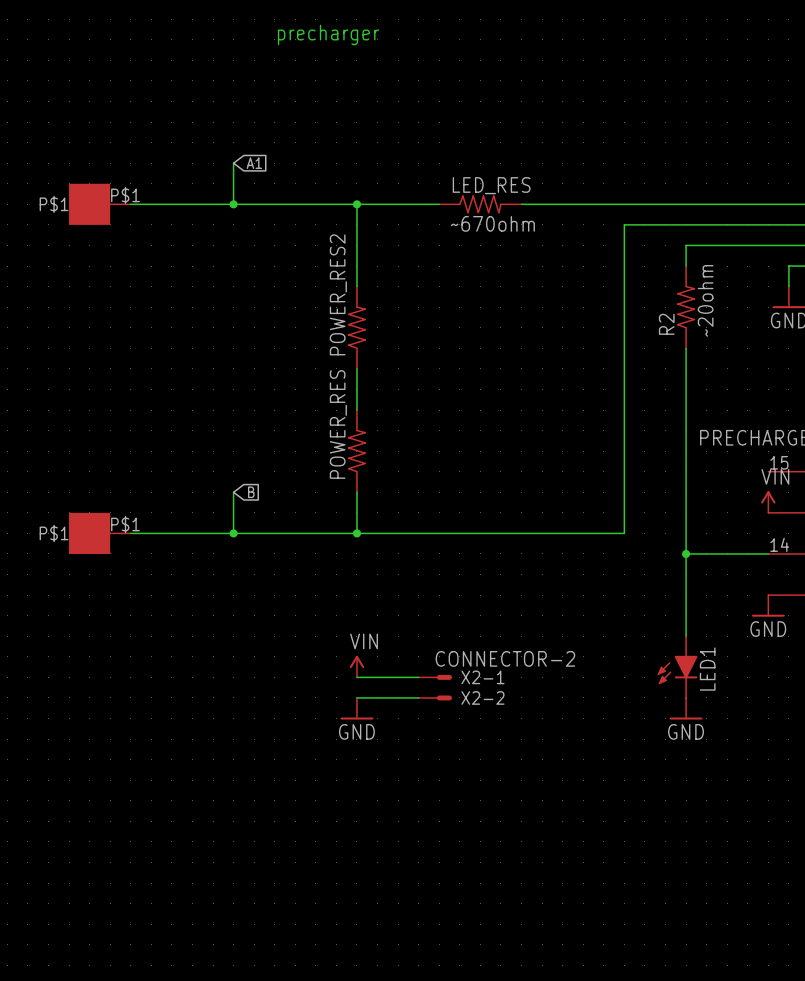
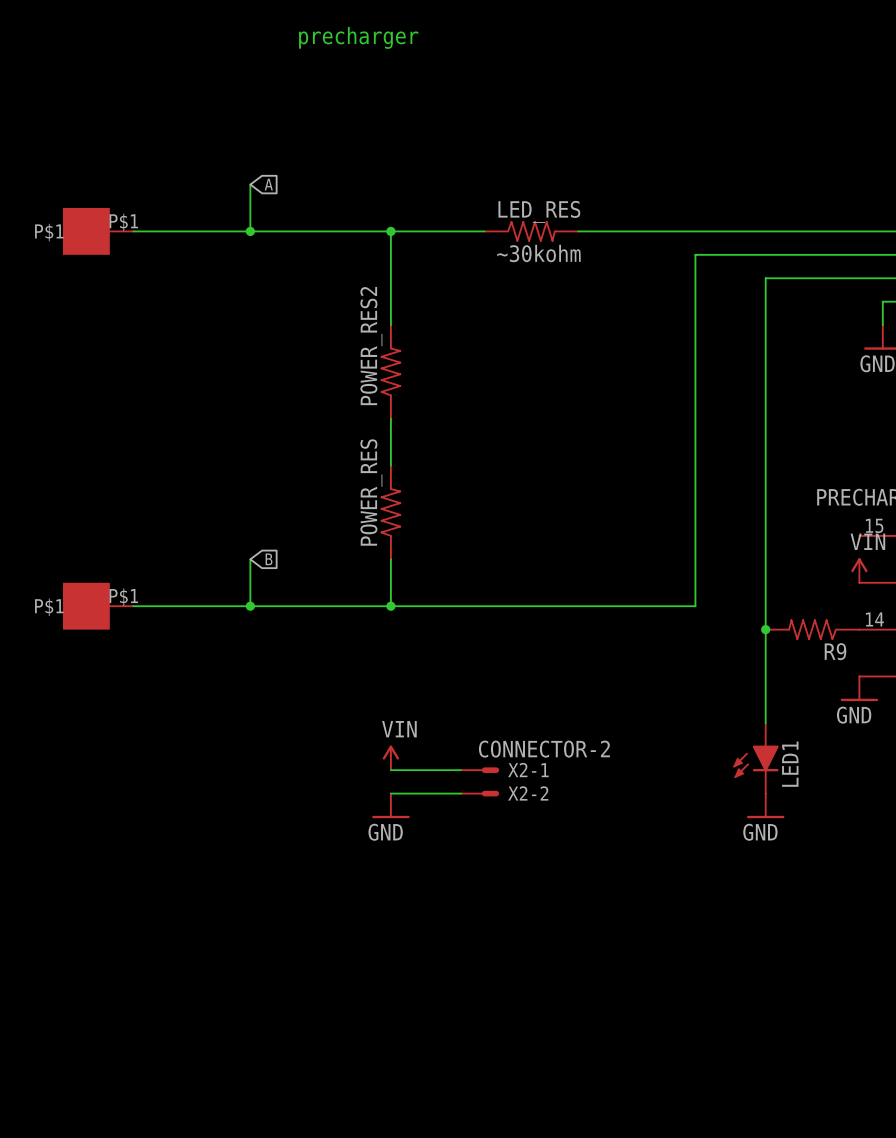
global label: A1 (254, 163) -> A (268, 184)
LED_RES value: ~670ohm (492, 223) -> ~30kohm (538, 253)
R2: ~20ohm (686, 307) -> none
R9: none -> (812, 629)

